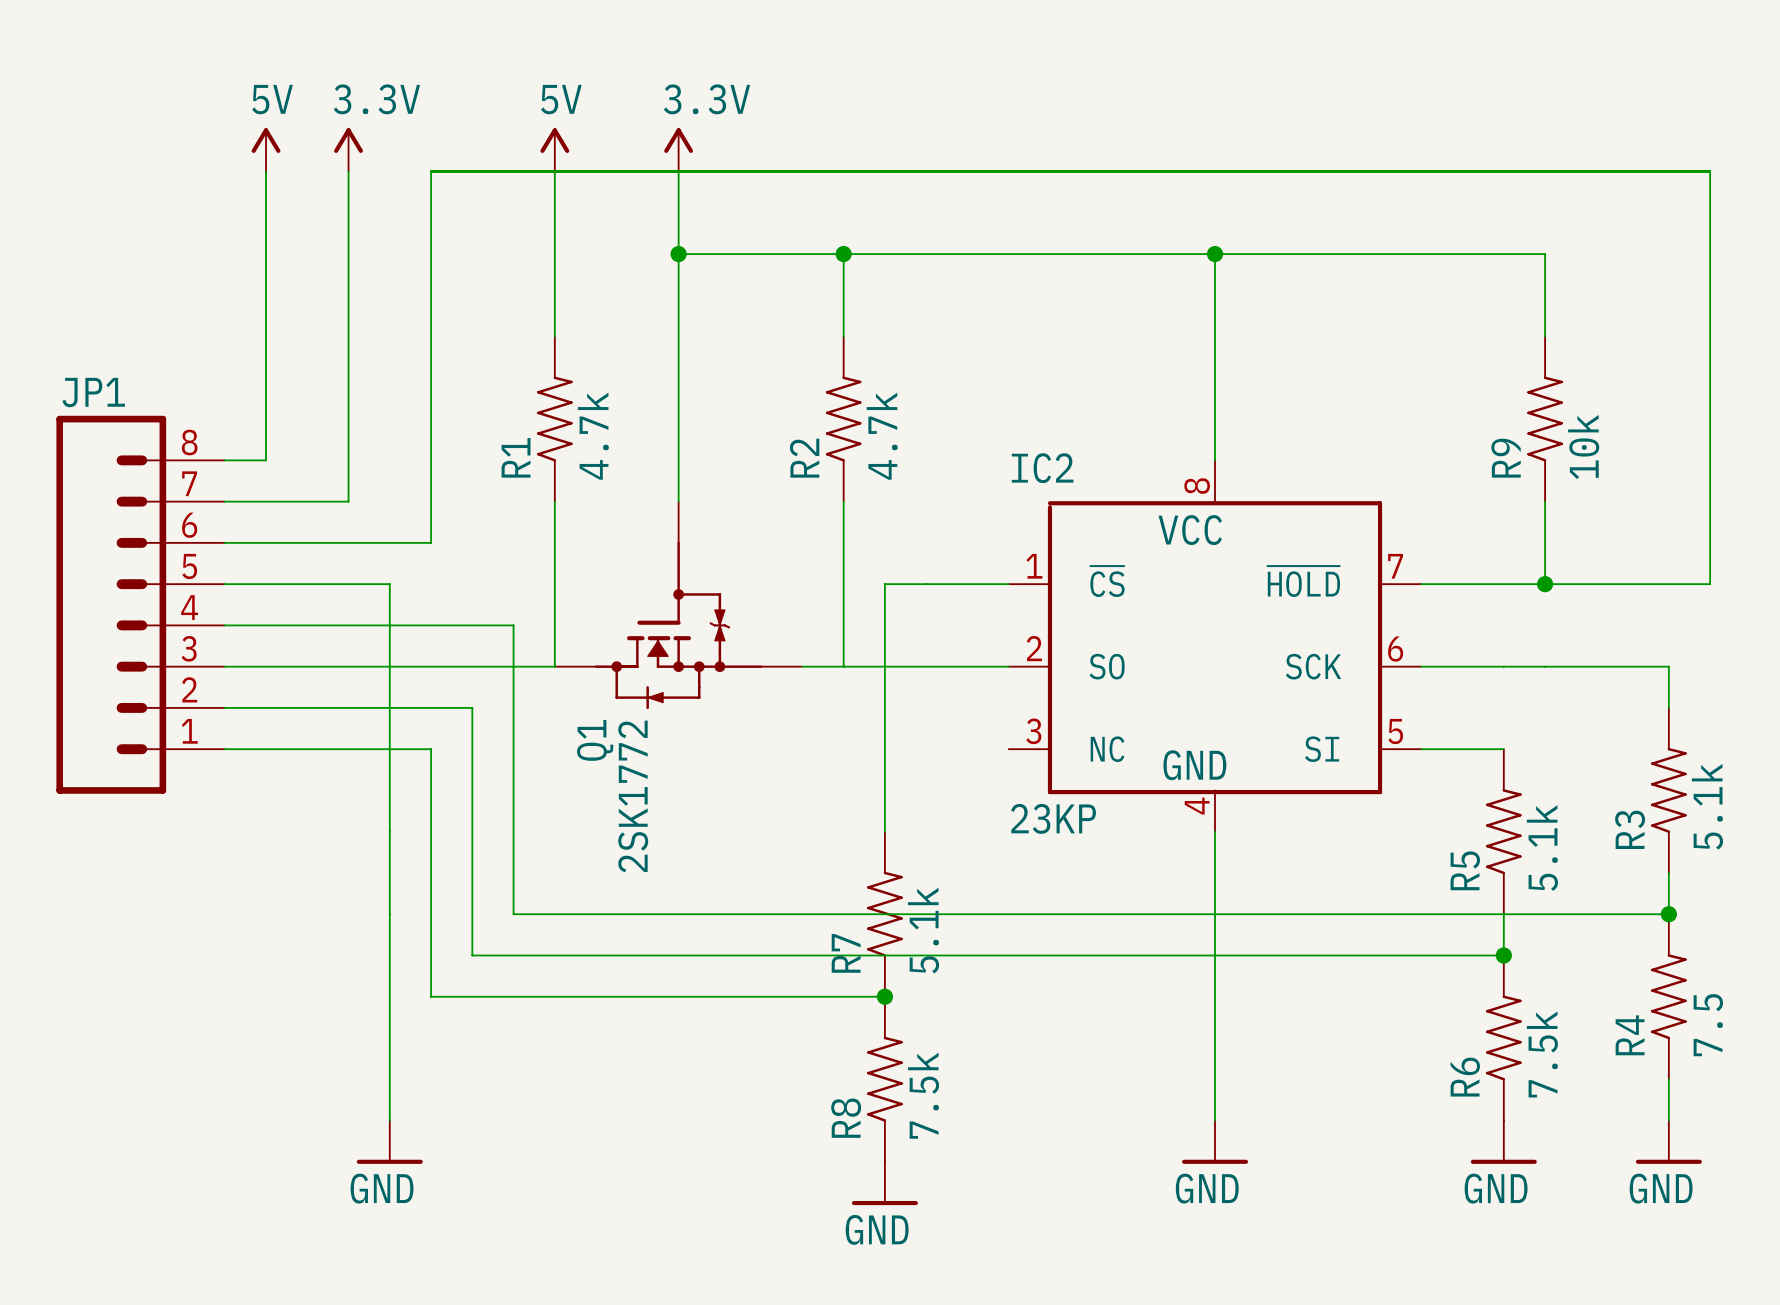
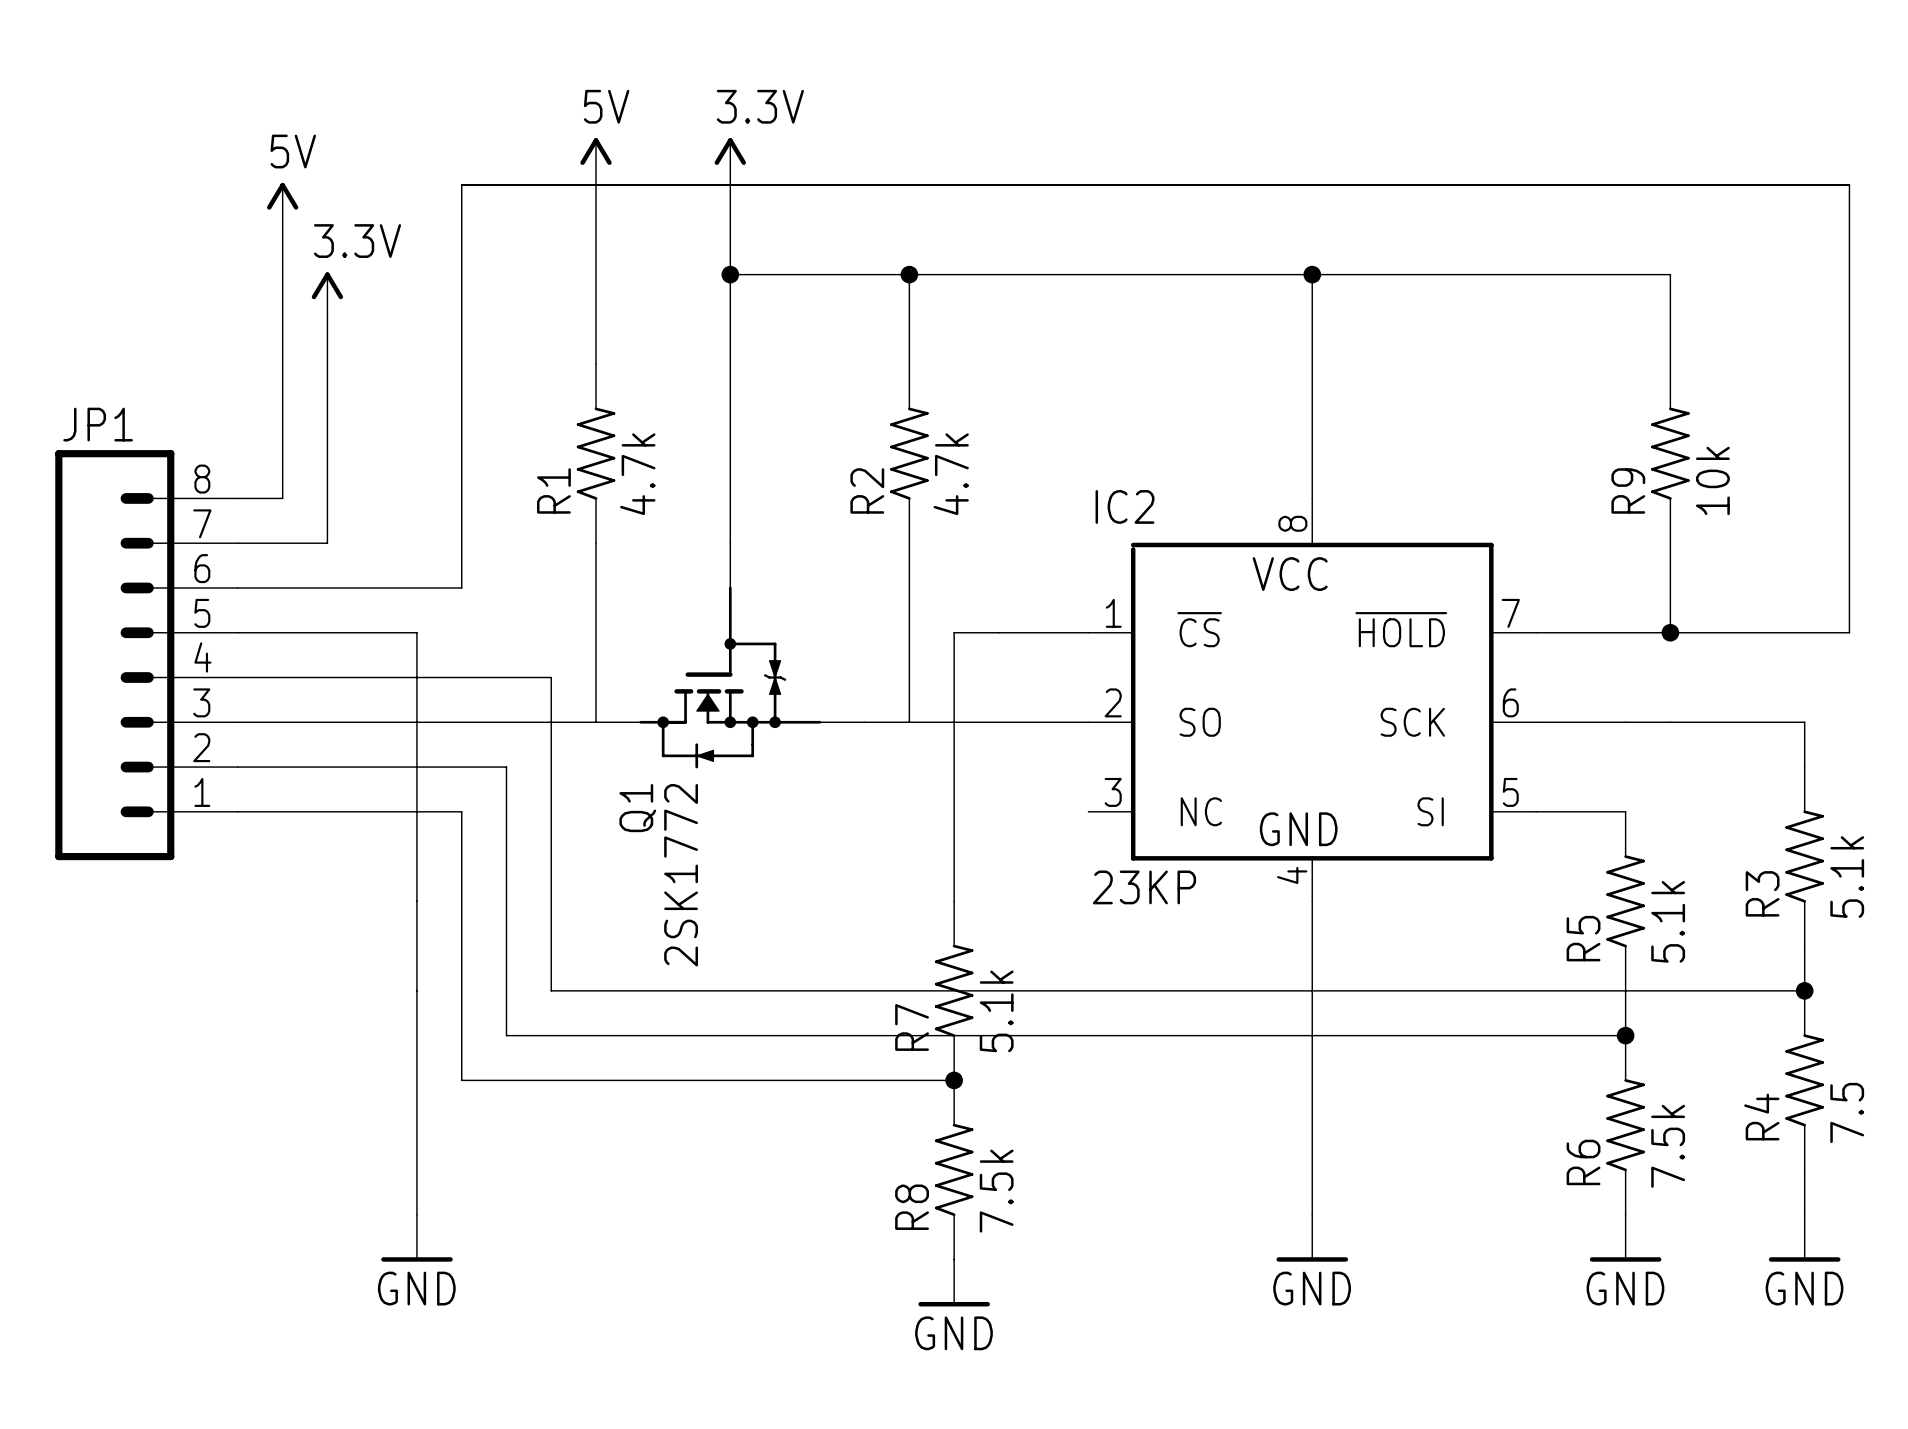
power symbol position: 5V (266, 149) -> 5V (282, 206)
power symbol position: 3.3V (348, 149) -> 3.3V (327, 295)
wire: (348, 171) (348, 501) (307, 501) -> (327, 319) (327, 543)

